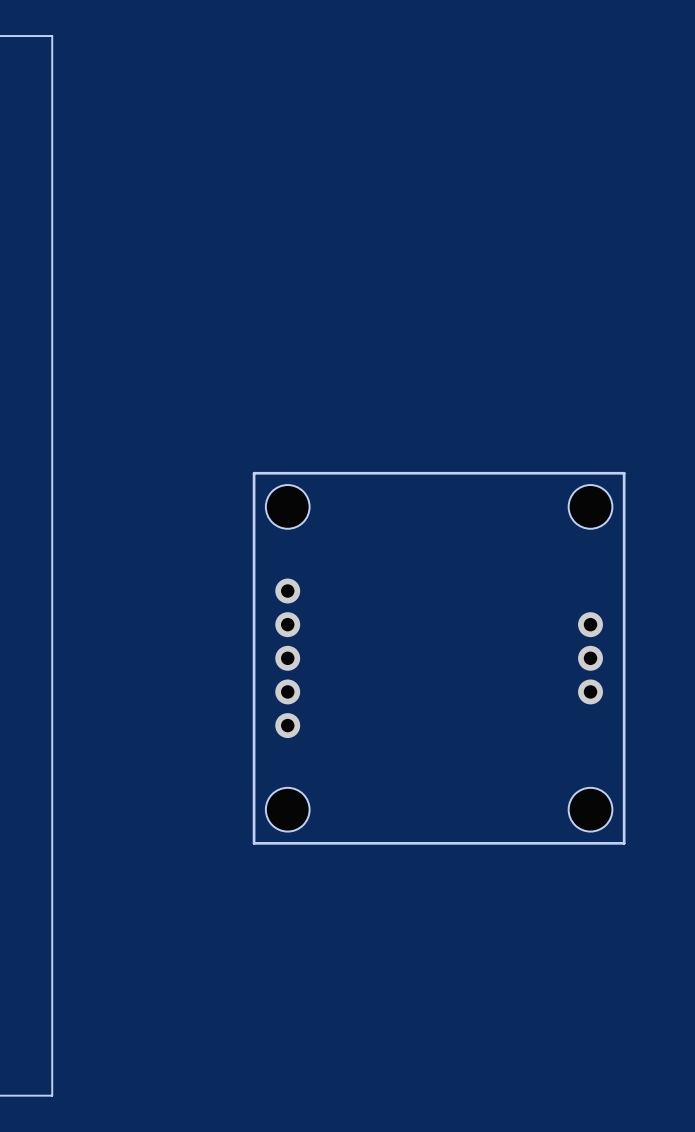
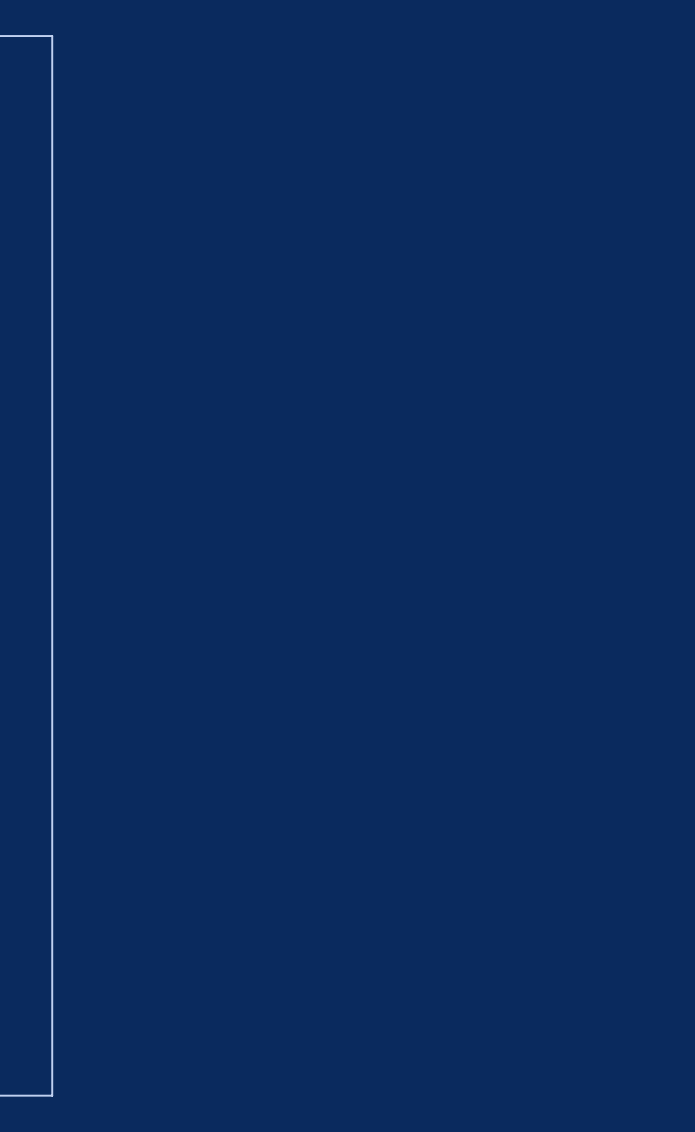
board edge: (624, 473) (254, 473) (254, 843) (624, 843) (624, 473) -> none
part: (287, 506) -> none
part: (590, 506) -> none
part: (287, 658) -> none
part: (590, 658) -> none
part: (287, 809) -> none
part: (590, 809) -> none

